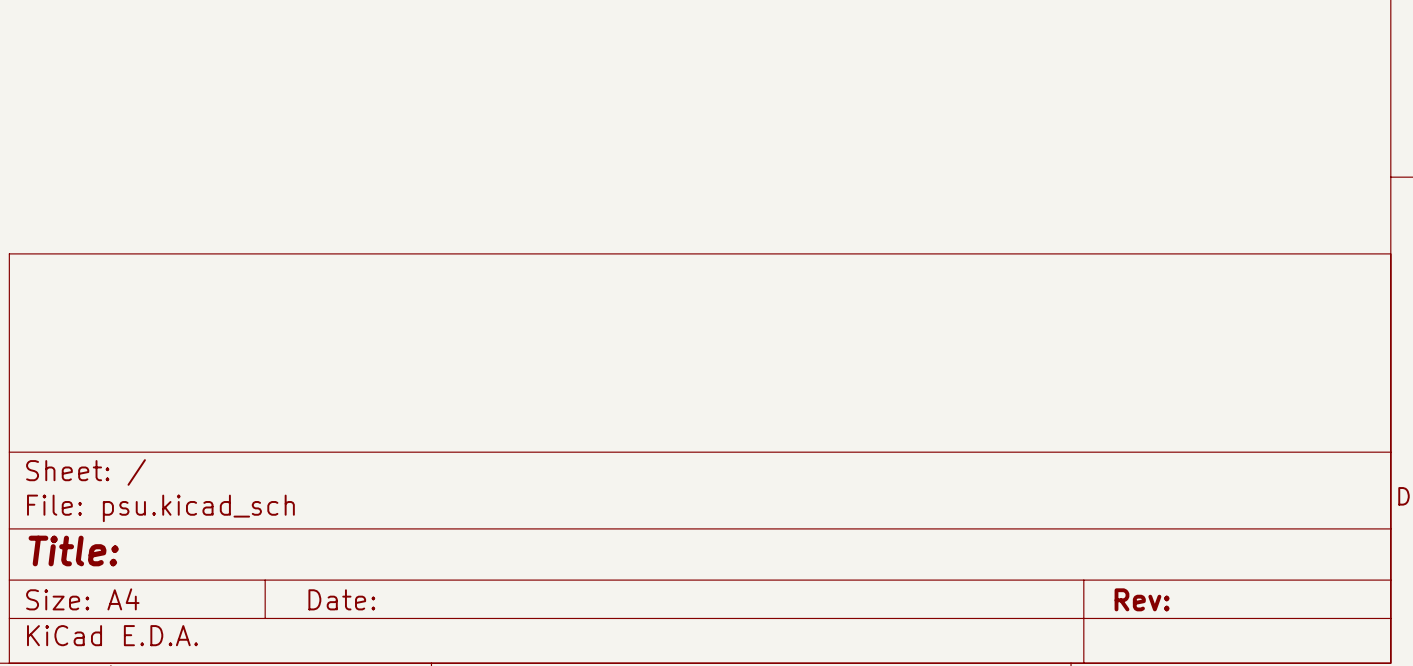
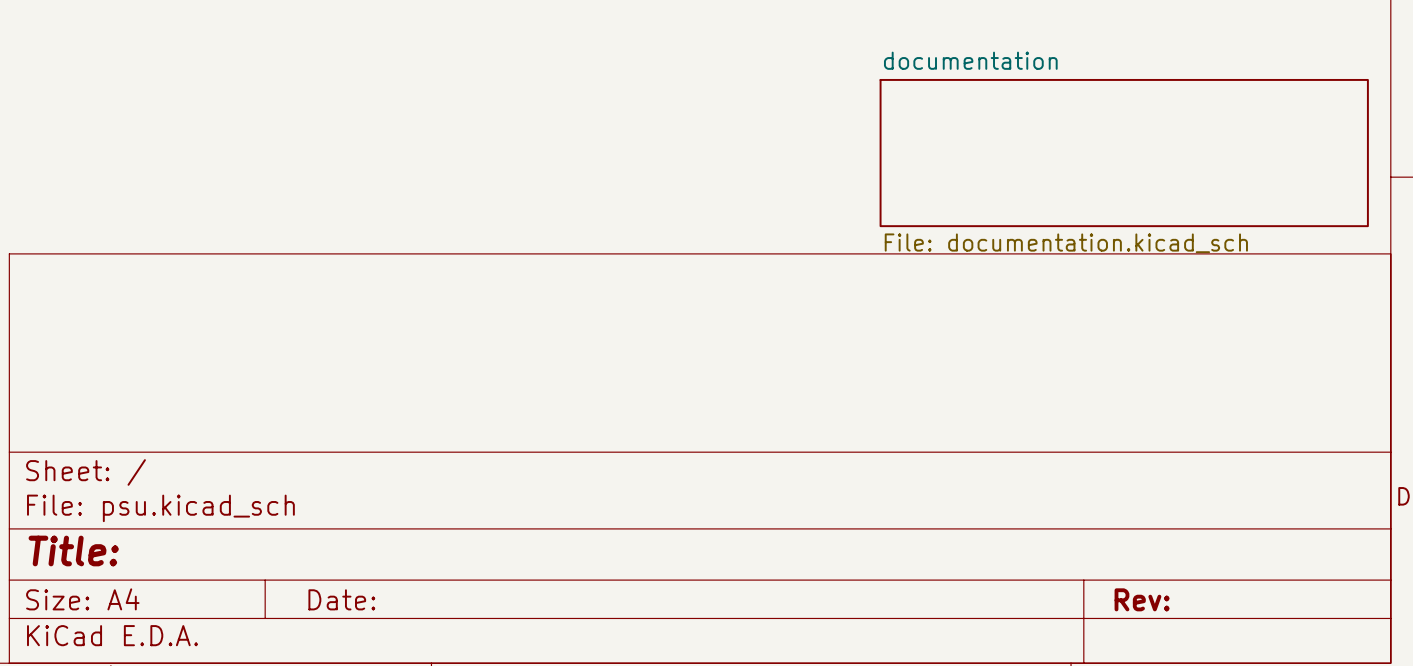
sheet documentation: none -> File: documentation.kicad_sch (1124, 153)

